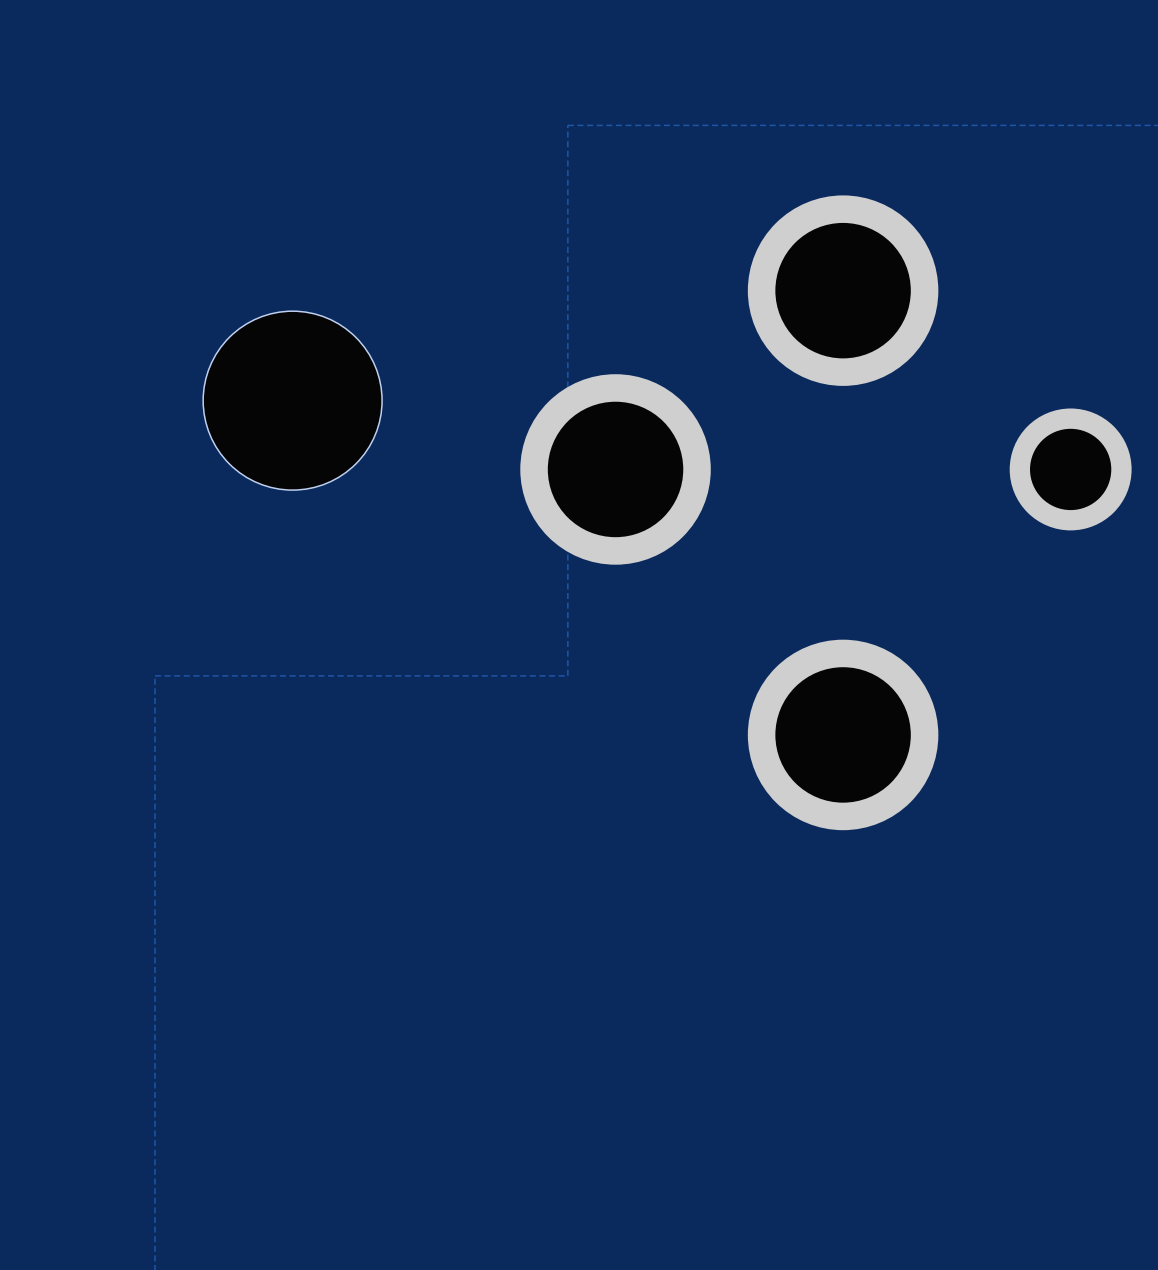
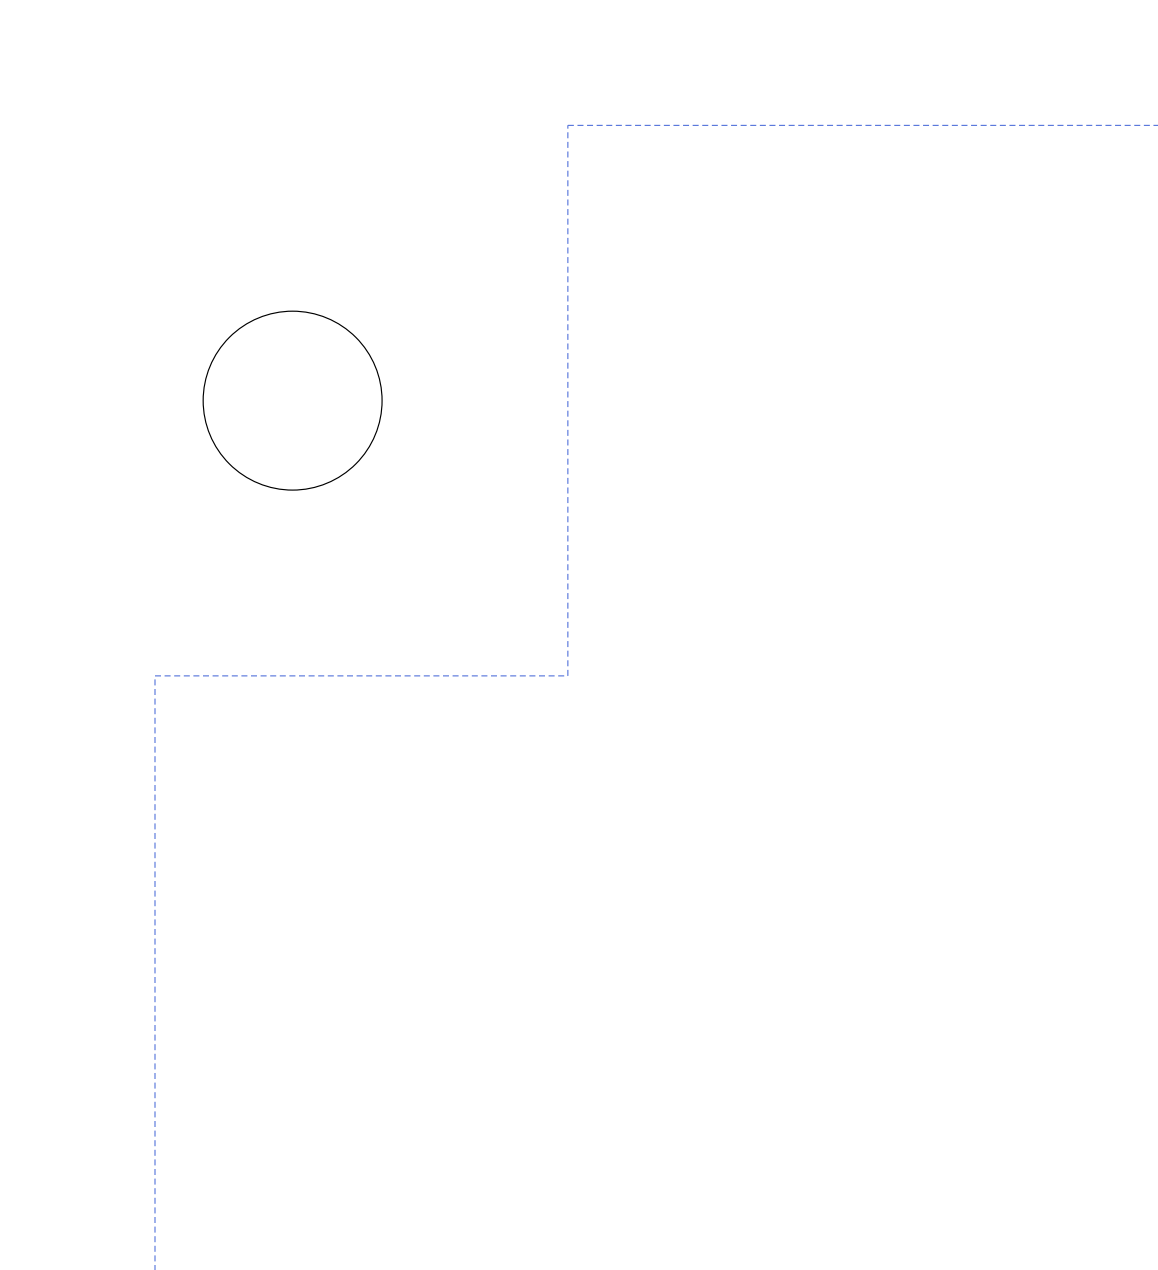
part: (825, 512) -> none

